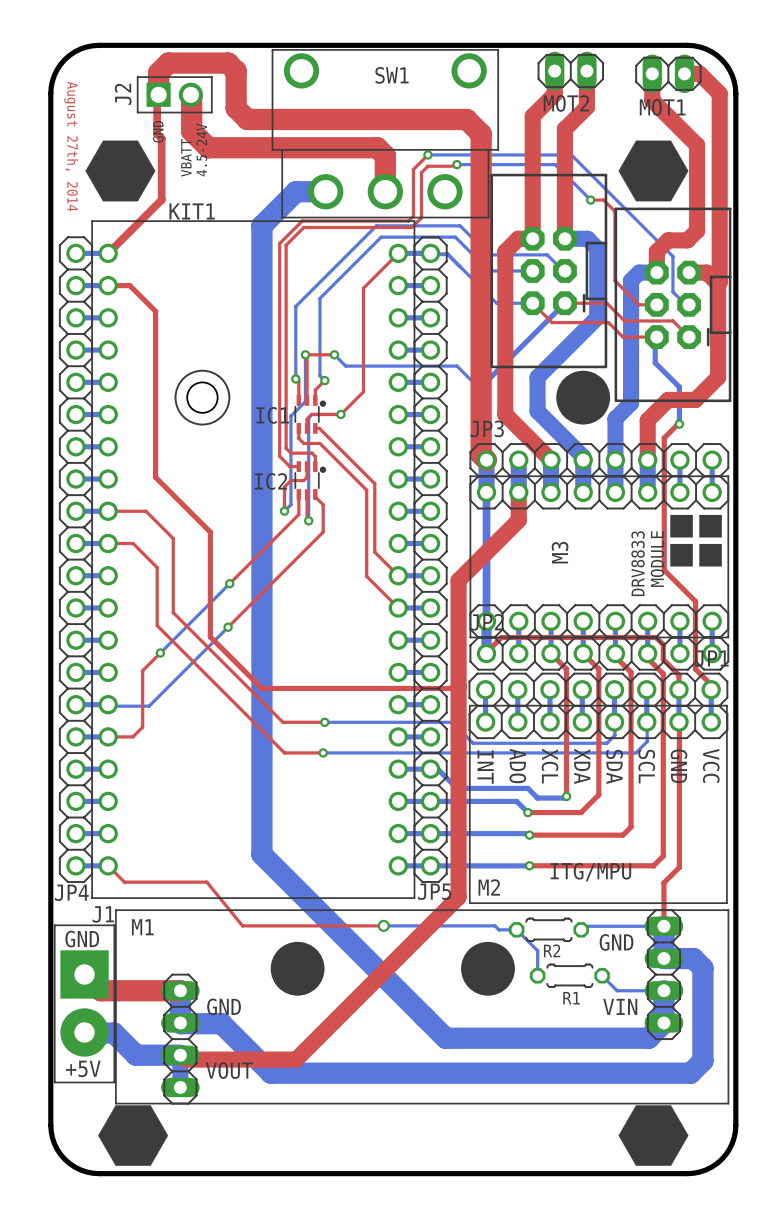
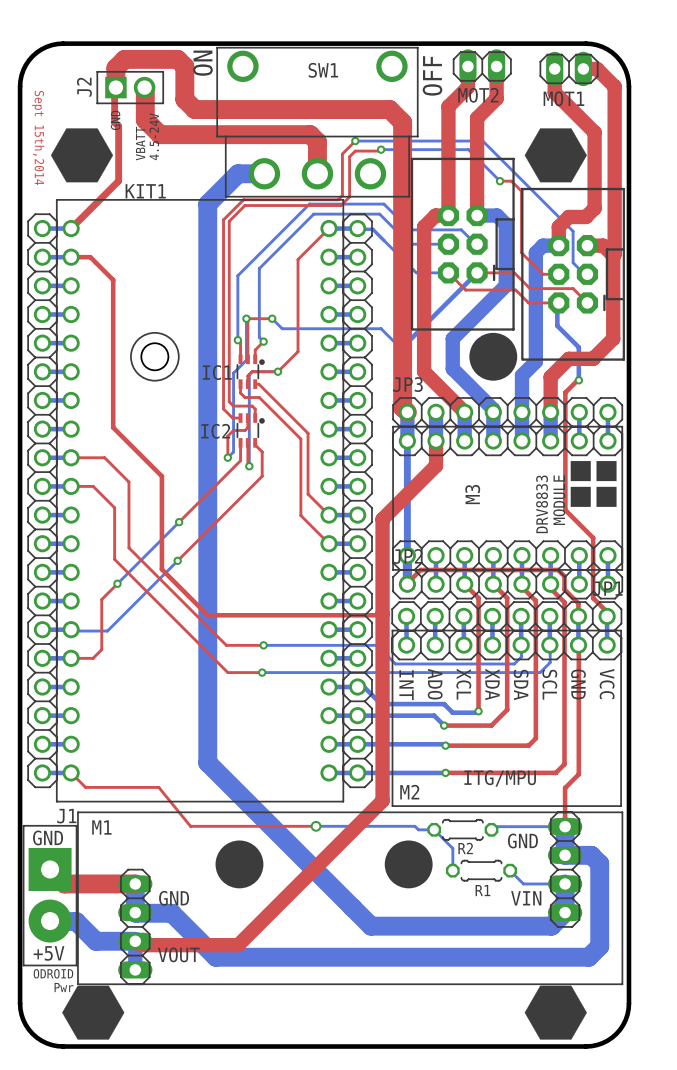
text: none -> ON (202, 63)
text: none -> OFF (432, 75)
text: August 27th, 2014 (71, 146) -> none
text: none -> Sept 15th,2014 (38, 137)
JP5 name: JP5 (434, 891) -> none
JP4 name: JP4 (71, 892) -> none
text: none -> ODROID (53, 973)
text: none -> Pwr (64, 987)

